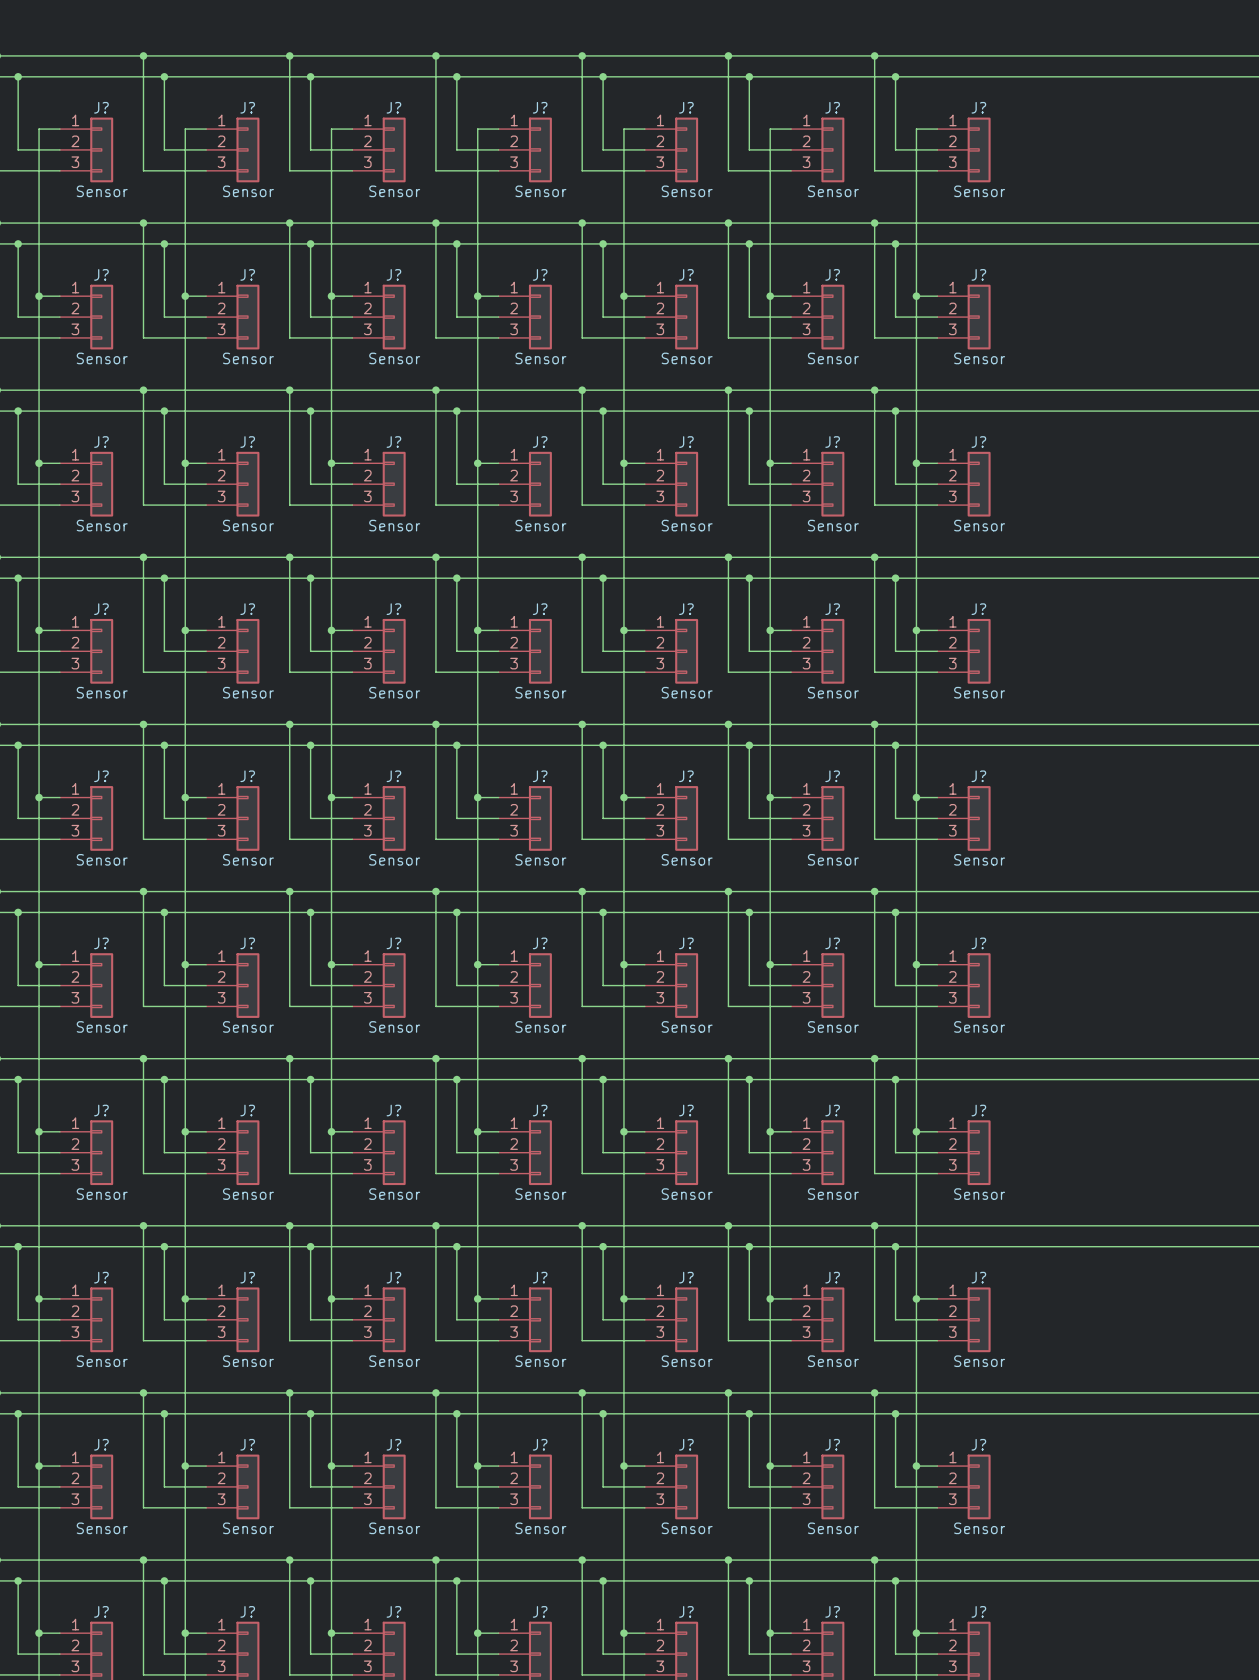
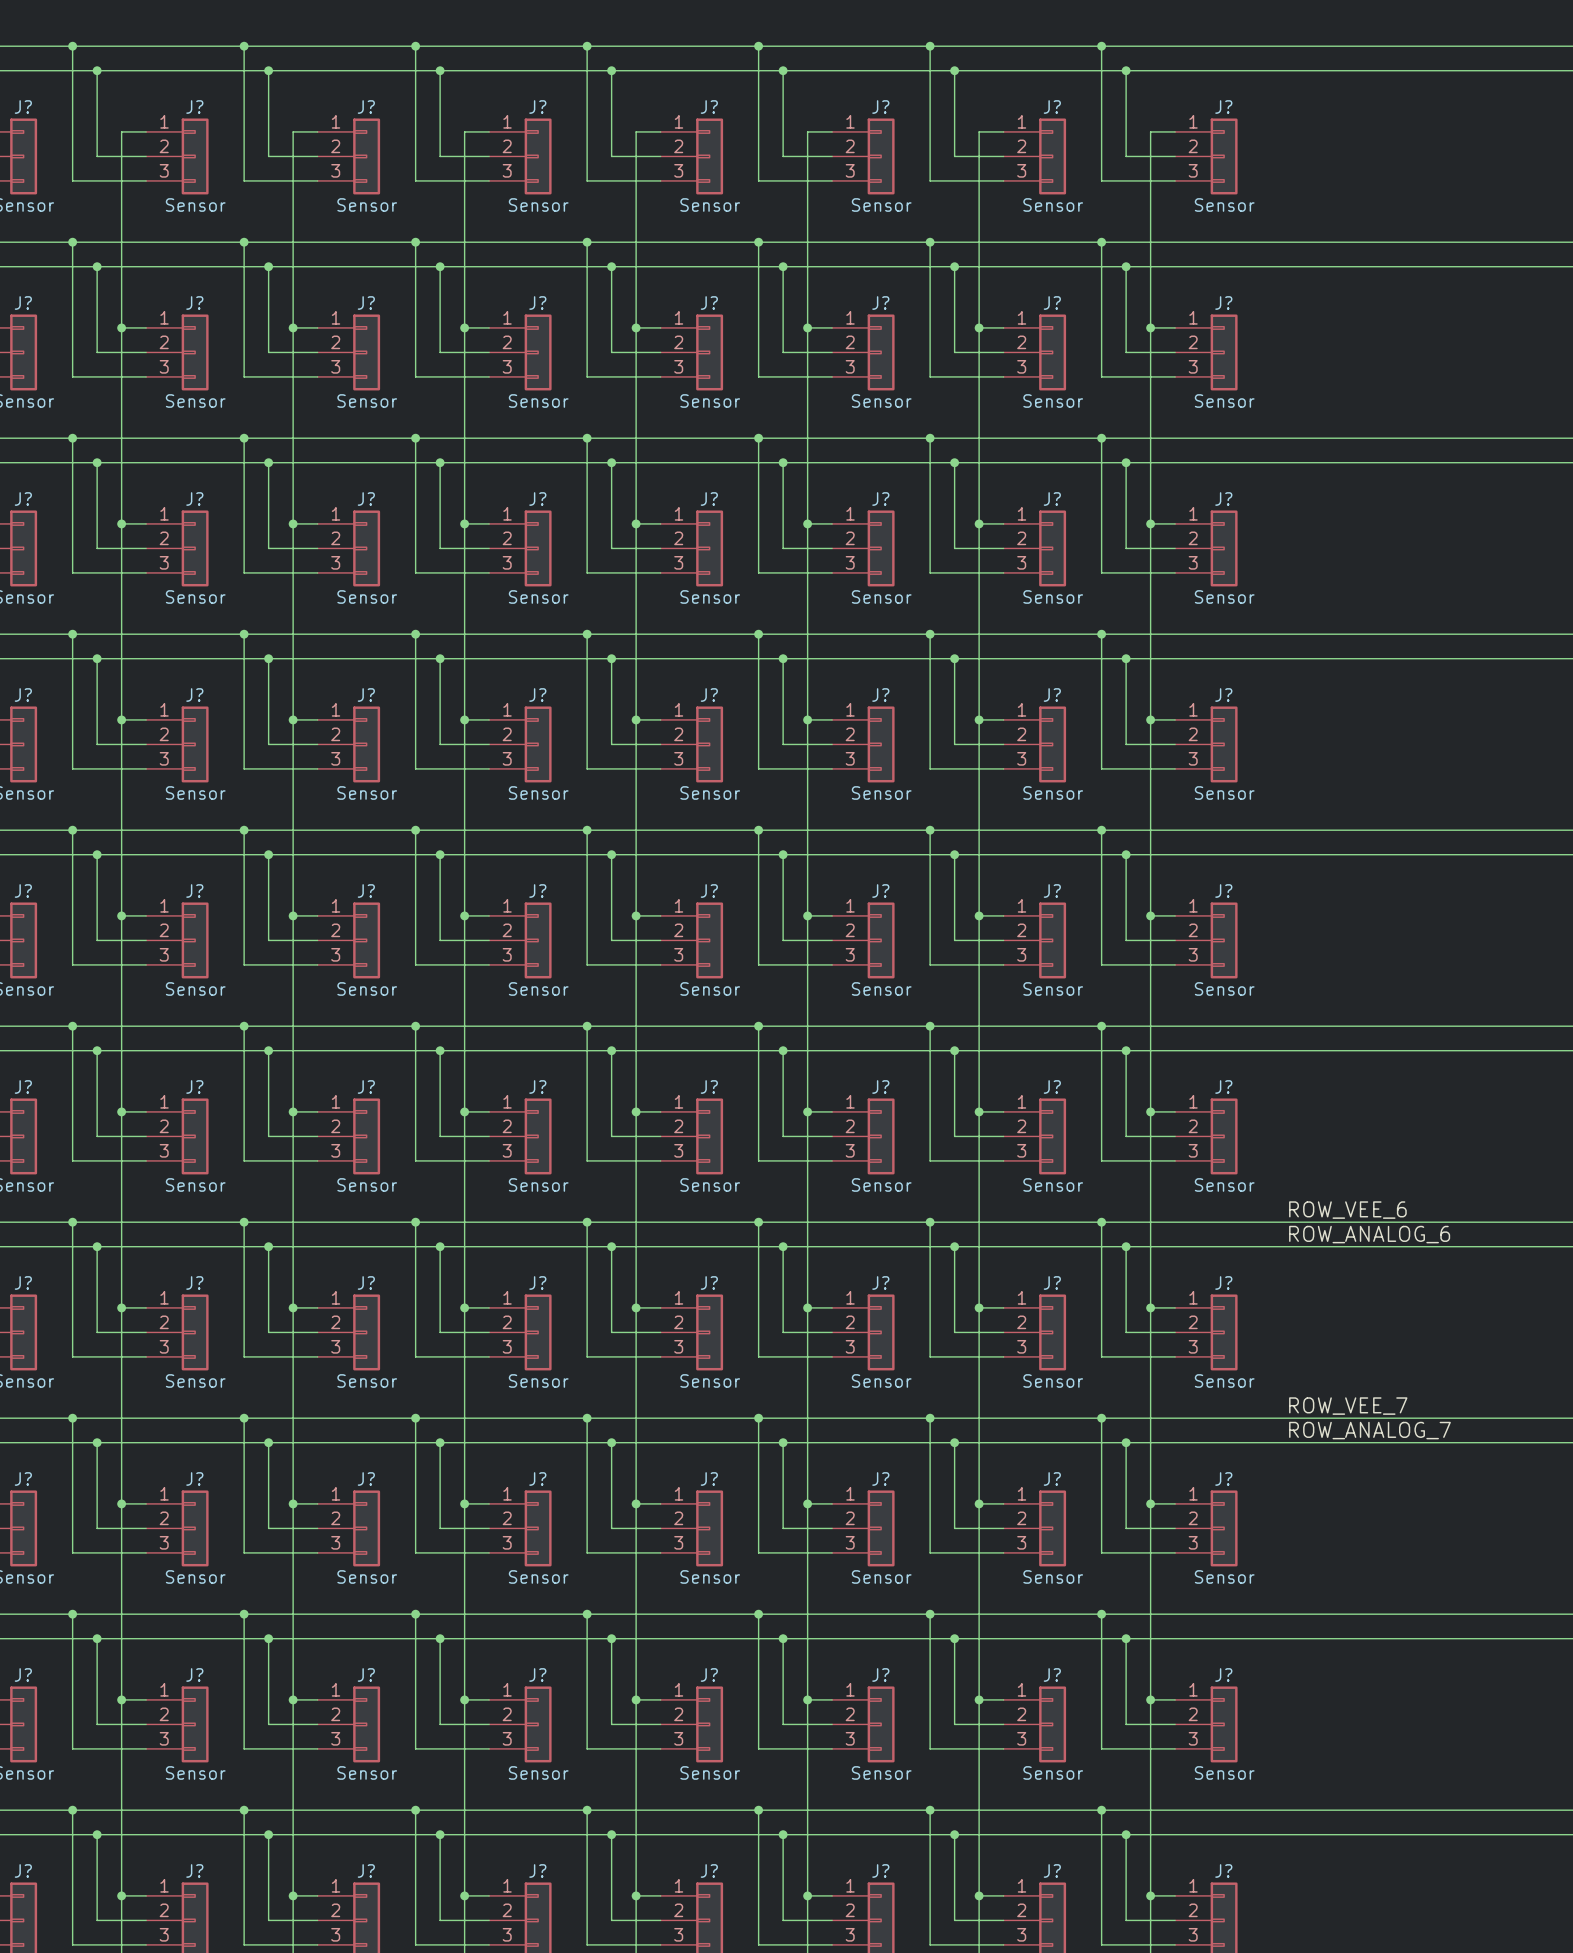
label: none -> ROW_VEE_6 (1347, 1210)
label: none -> ROW_ANALOG_6 (1369, 1234)
label: none -> ROW_VEE_7 (1348, 1406)
label: none -> ROW_ANALOG_7 (1369, 1430)

